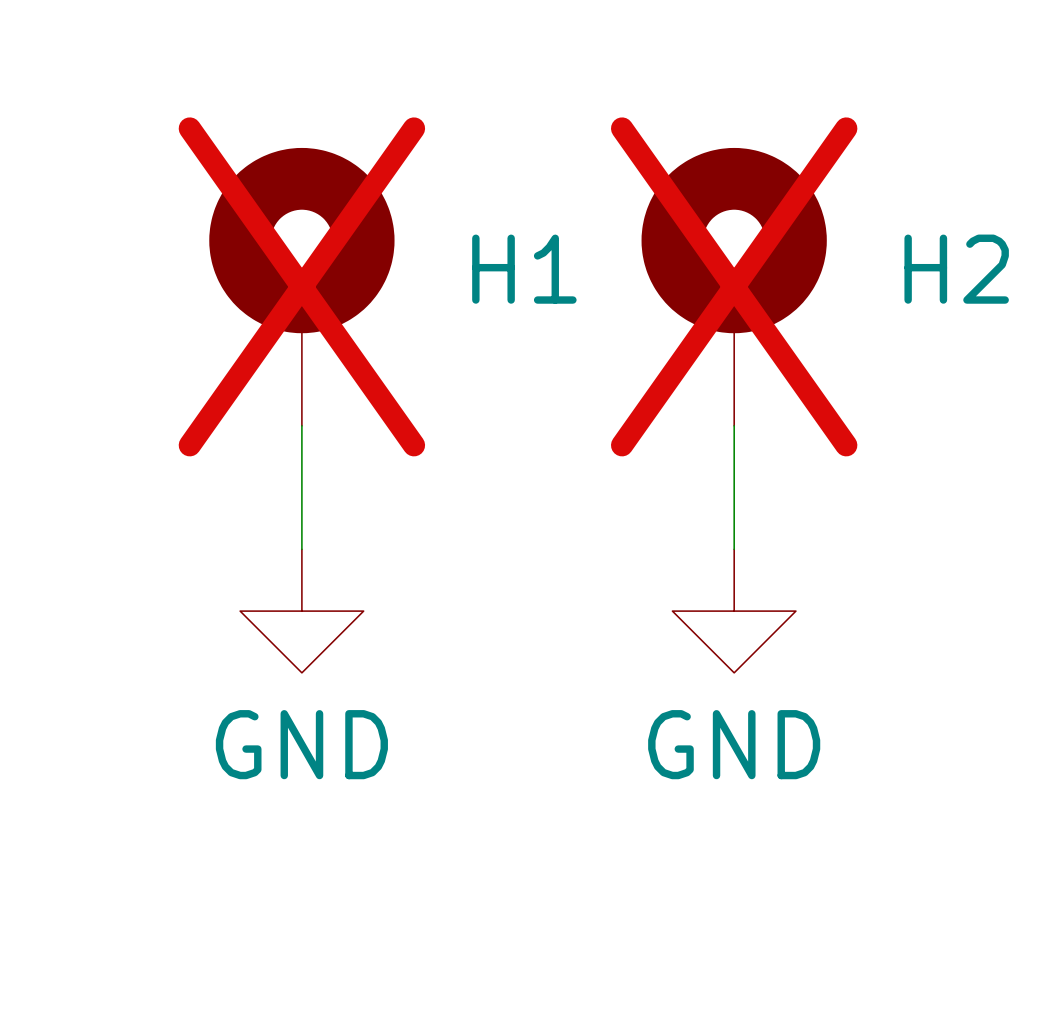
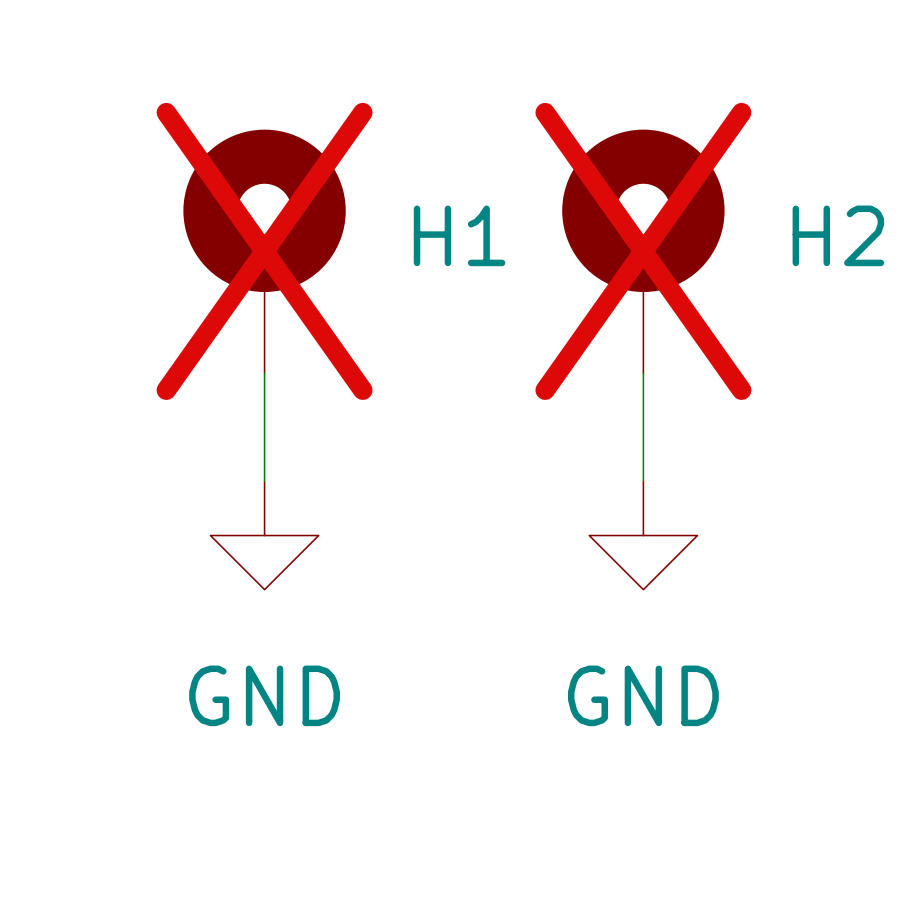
power symbol text position: GND (301, 744) -> GND (264, 695)
power symbol text position: GND (734, 744) -> GND (643, 695)

